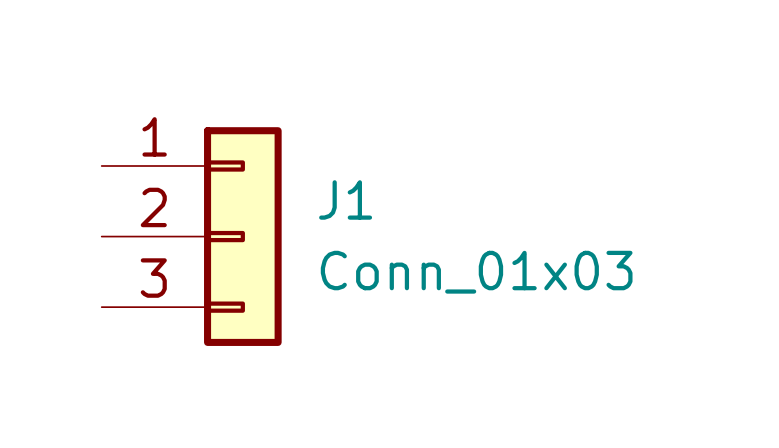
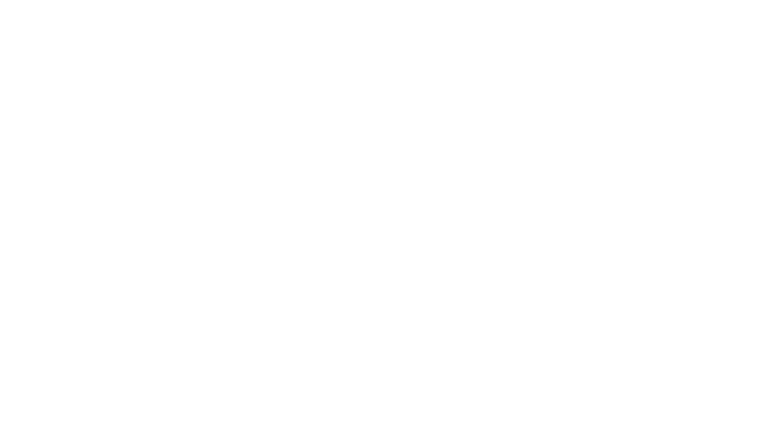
J1: Conn_01x03 (191, 236) -> none

